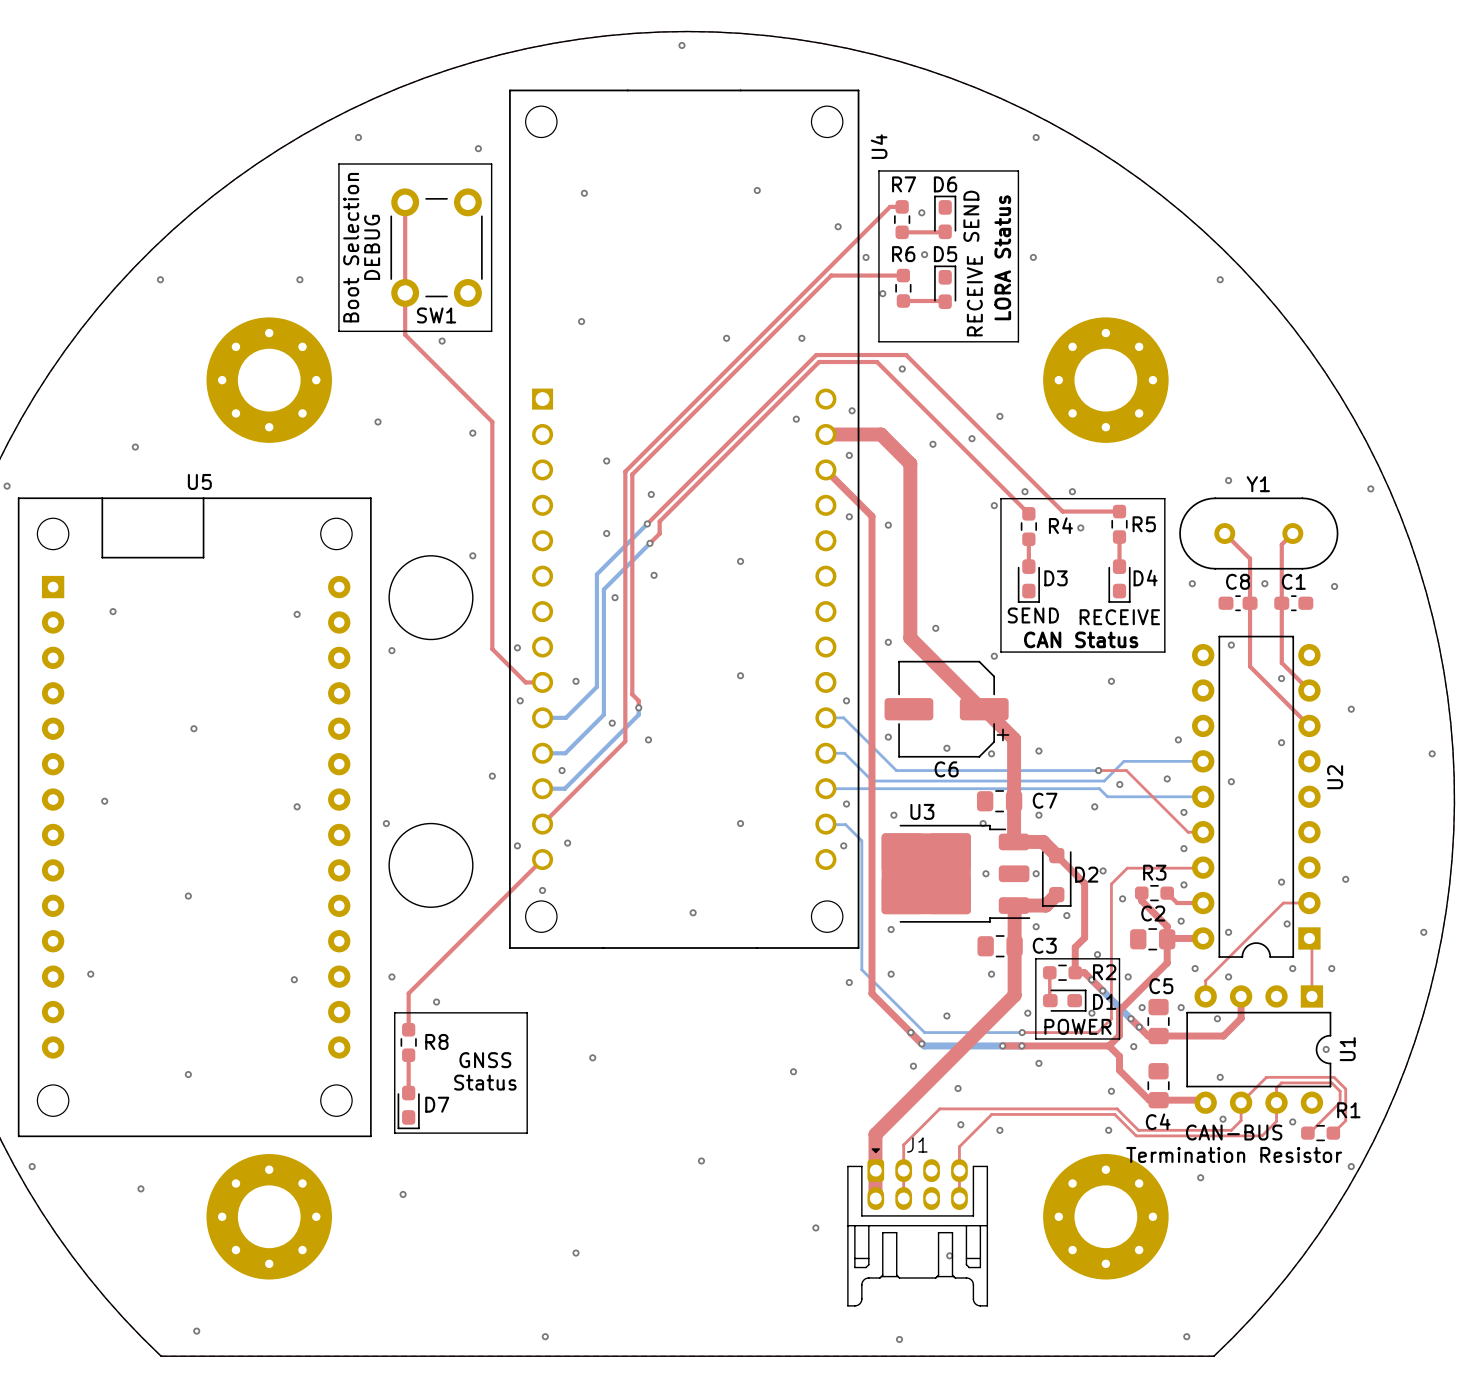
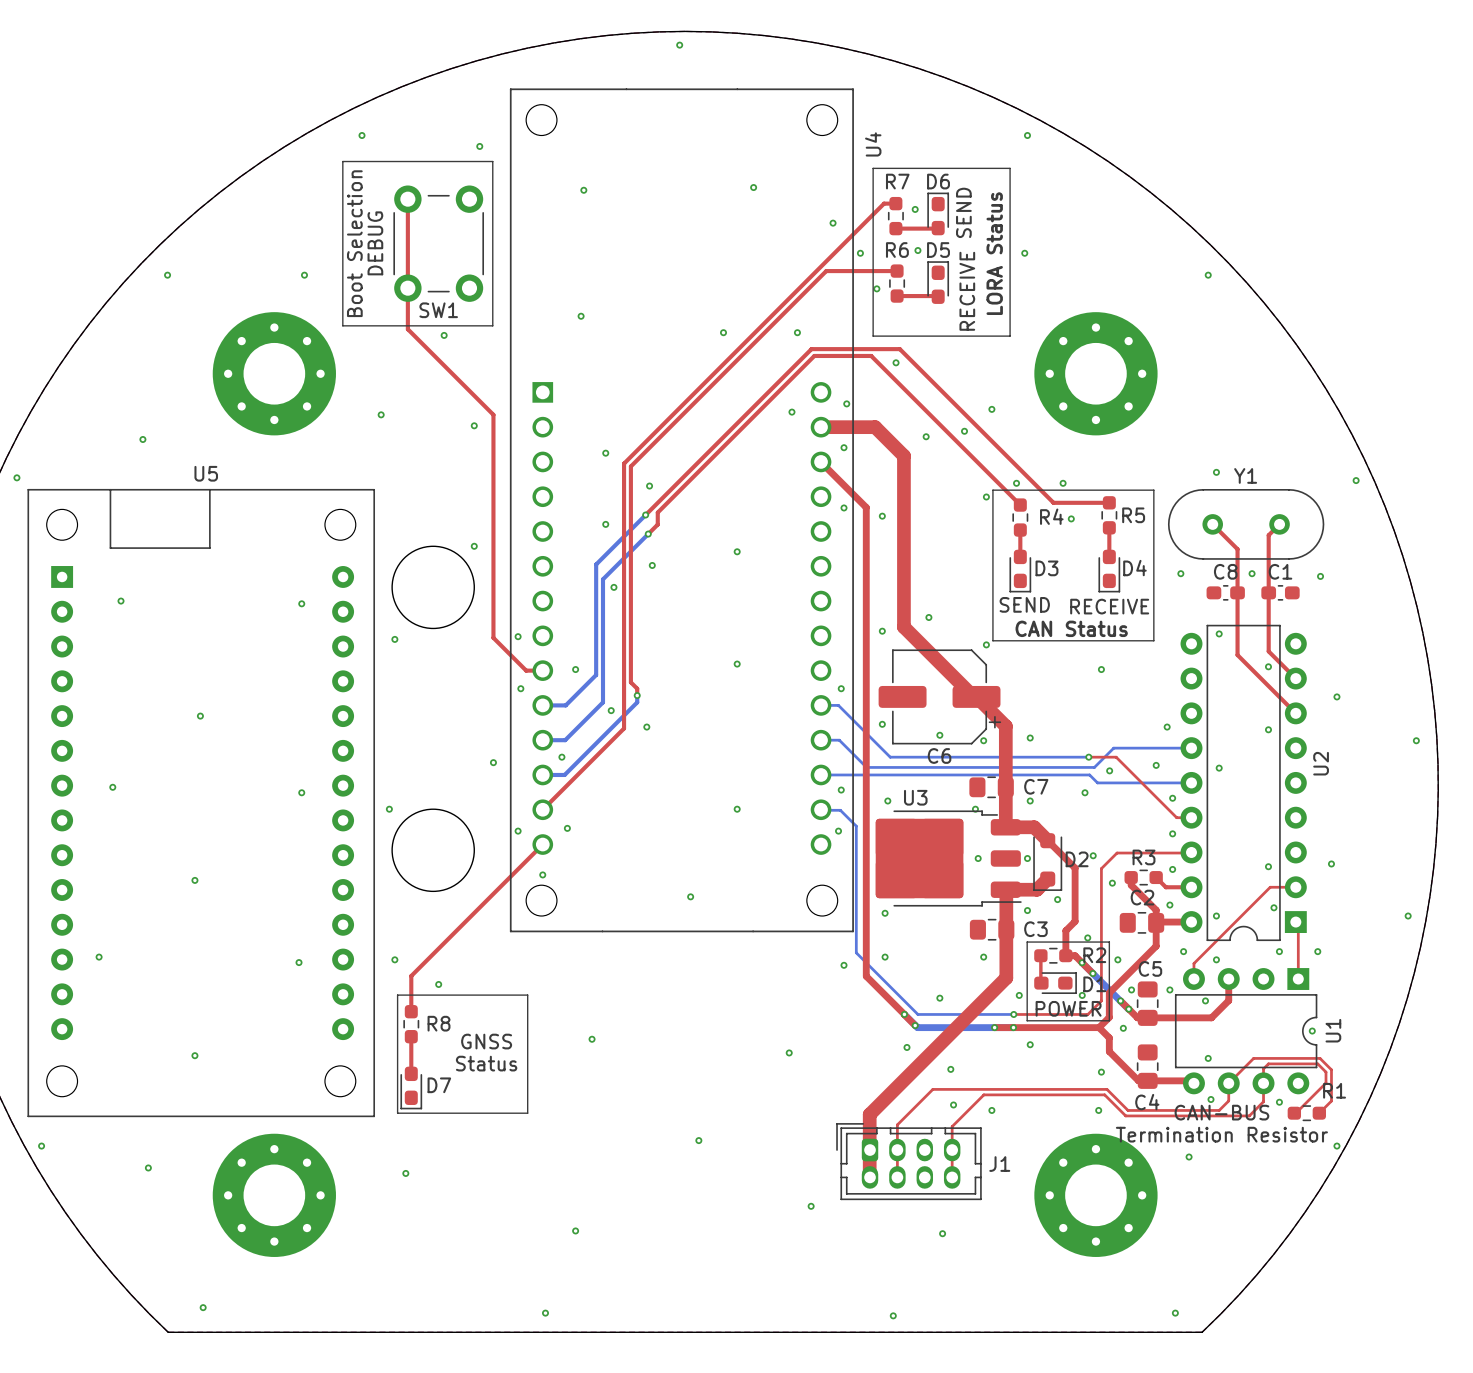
J1 name position: J1 (917, 1145) -> J1 (999, 1164)
J1 footprint: [847, 1148, 989, 1307] -> [836, 1123, 982, 1201]

